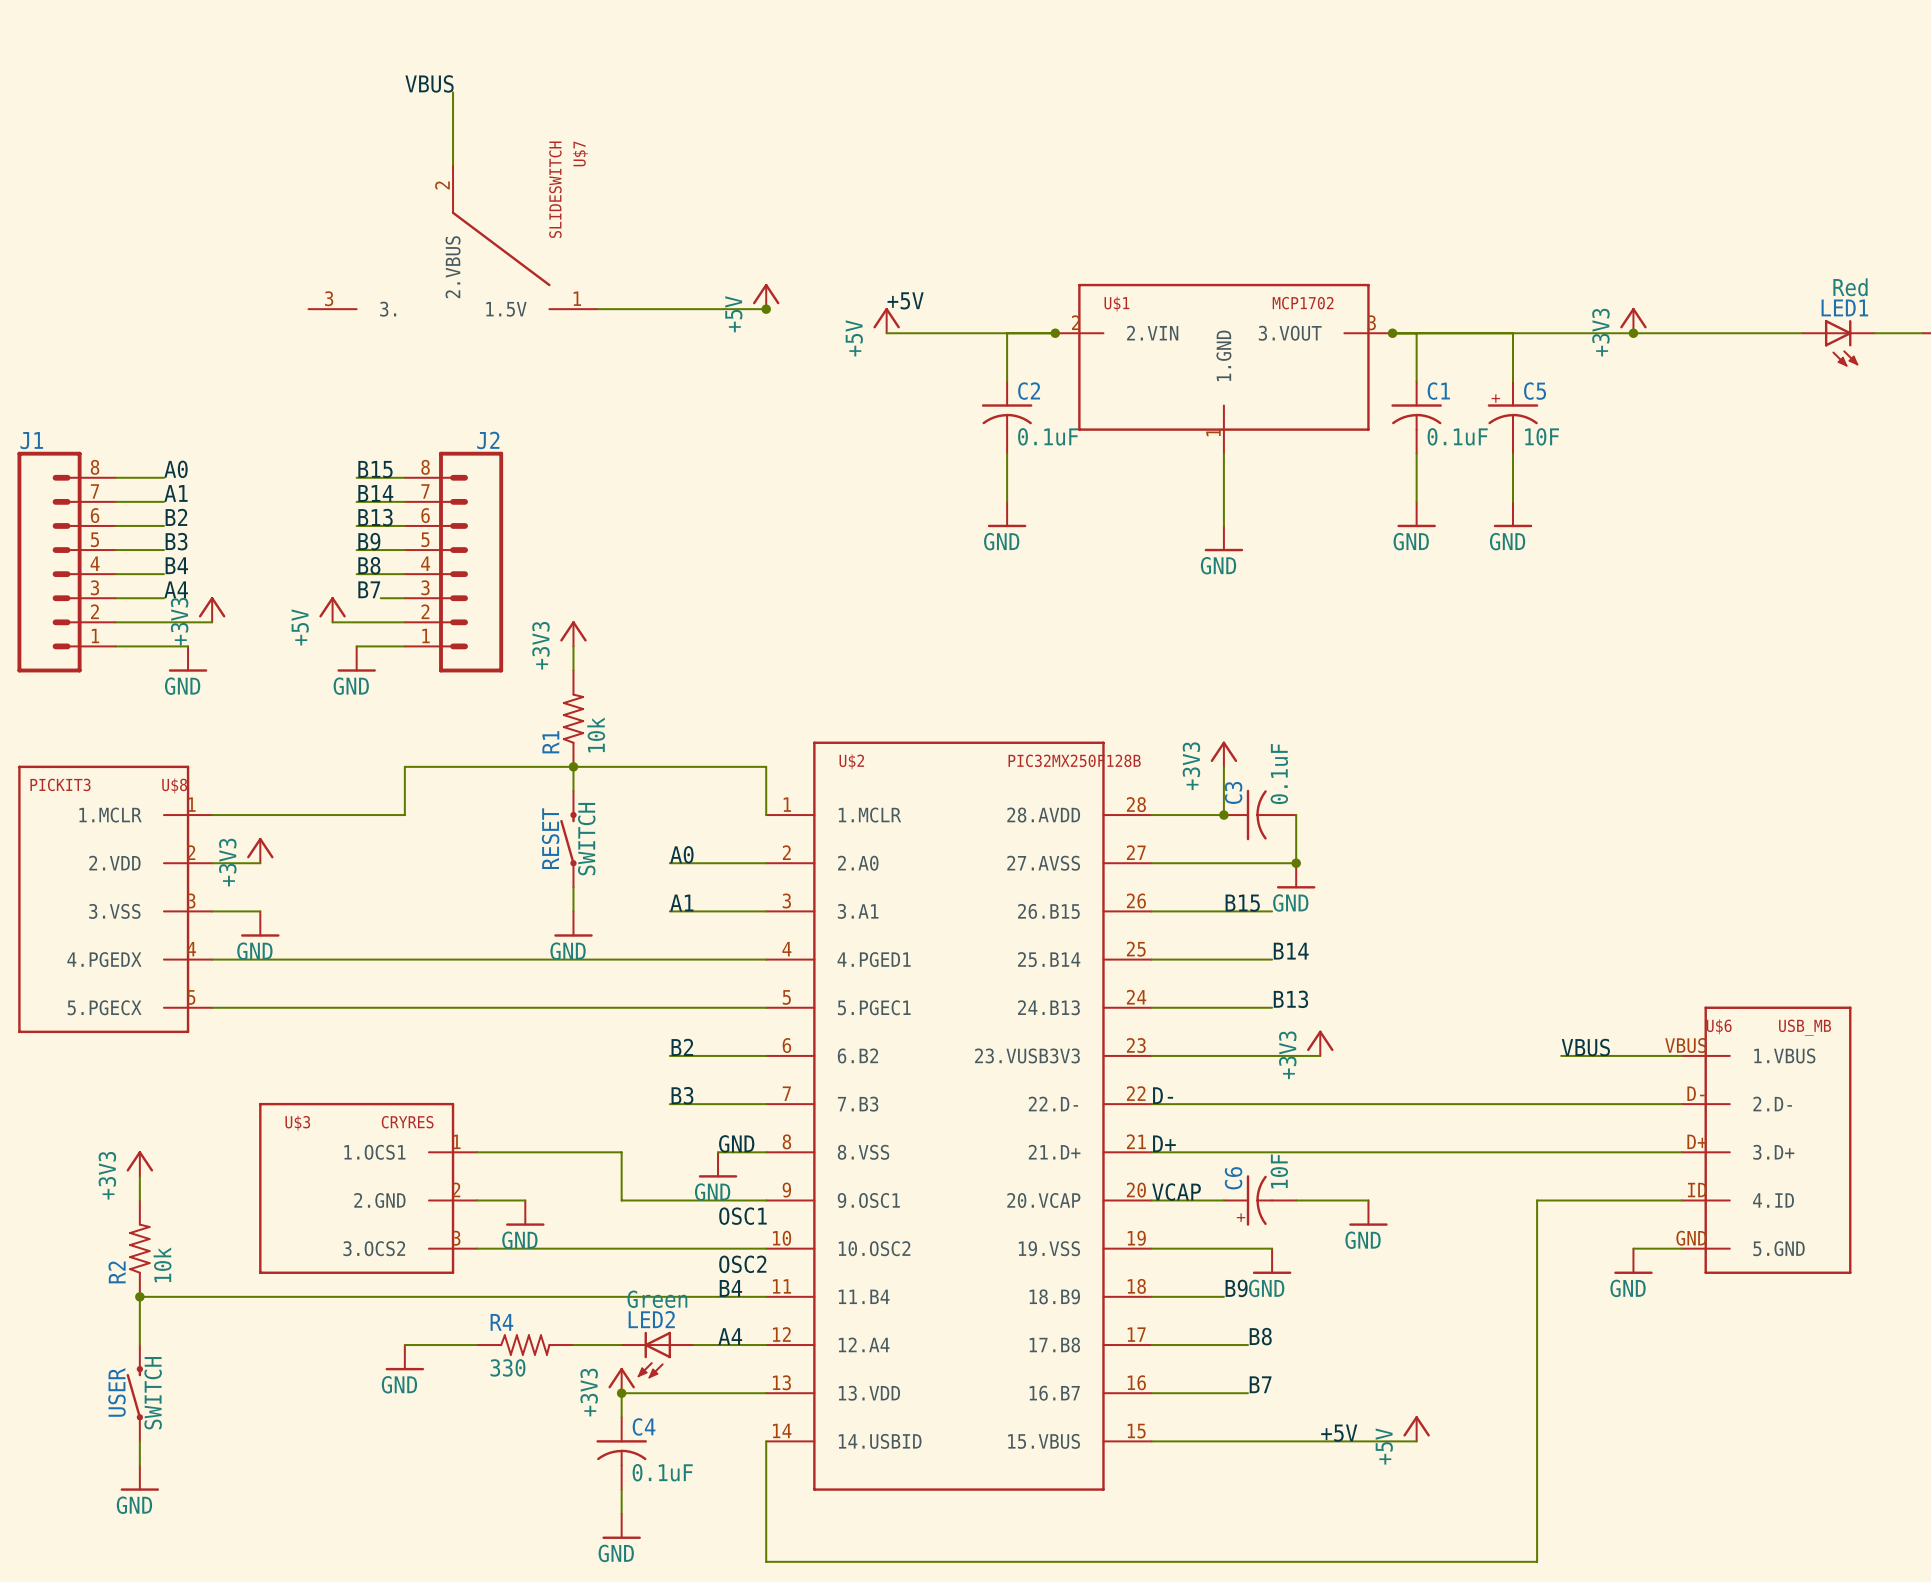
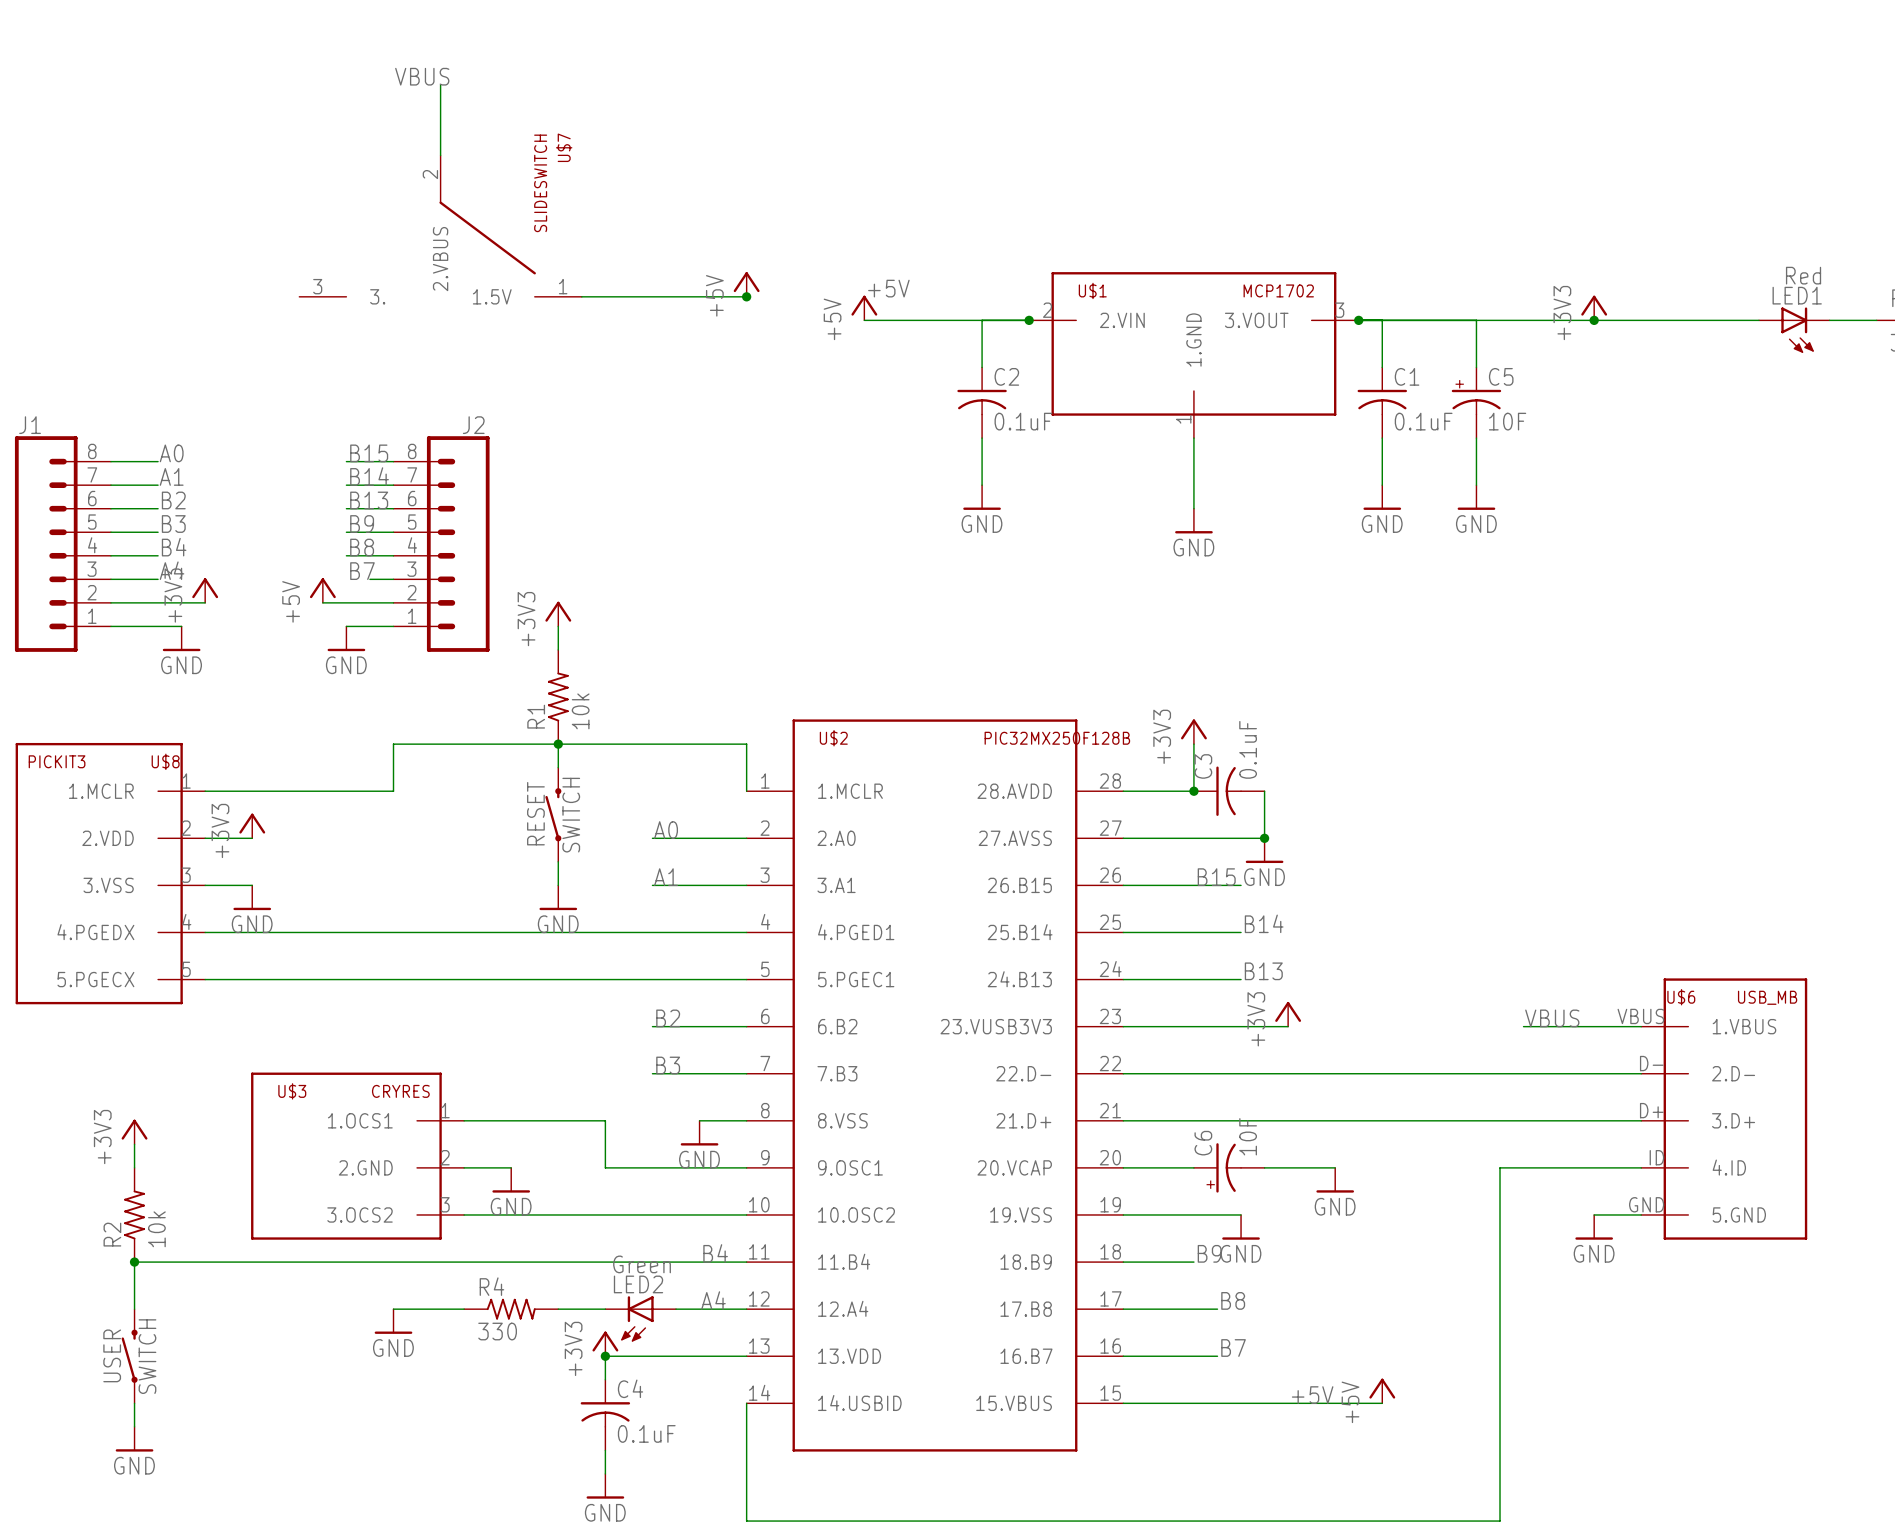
label: D- (1163, 1095) -> none
label: GND (736, 1143) -> none
label: D+ (1164, 1143) -> none
label: VCAP (1176, 1192) -> none
label: OSC1 (742, 1216) -> none
label: OSC2 (742, 1264) -> none

